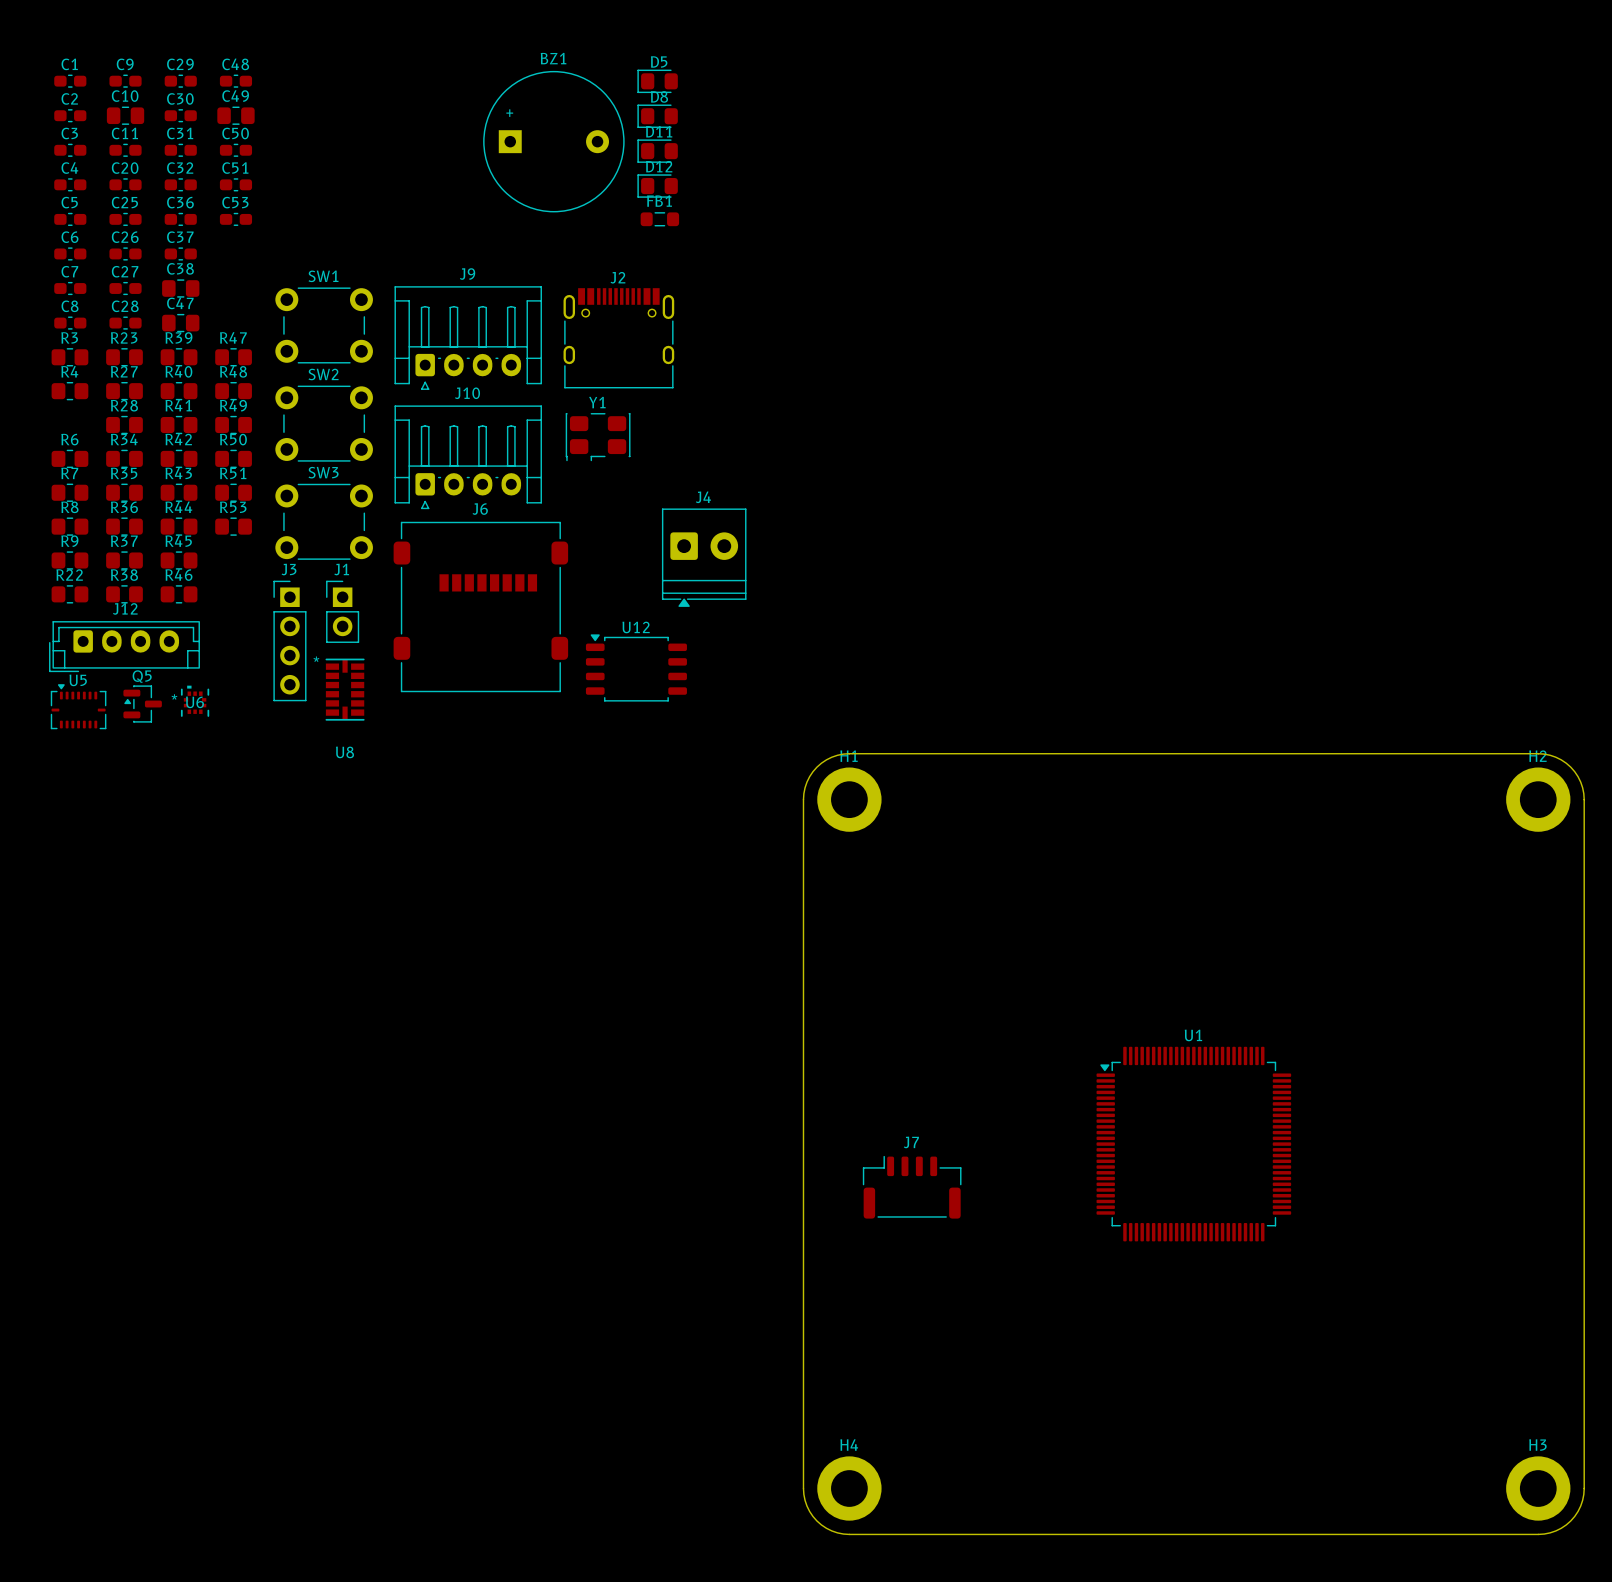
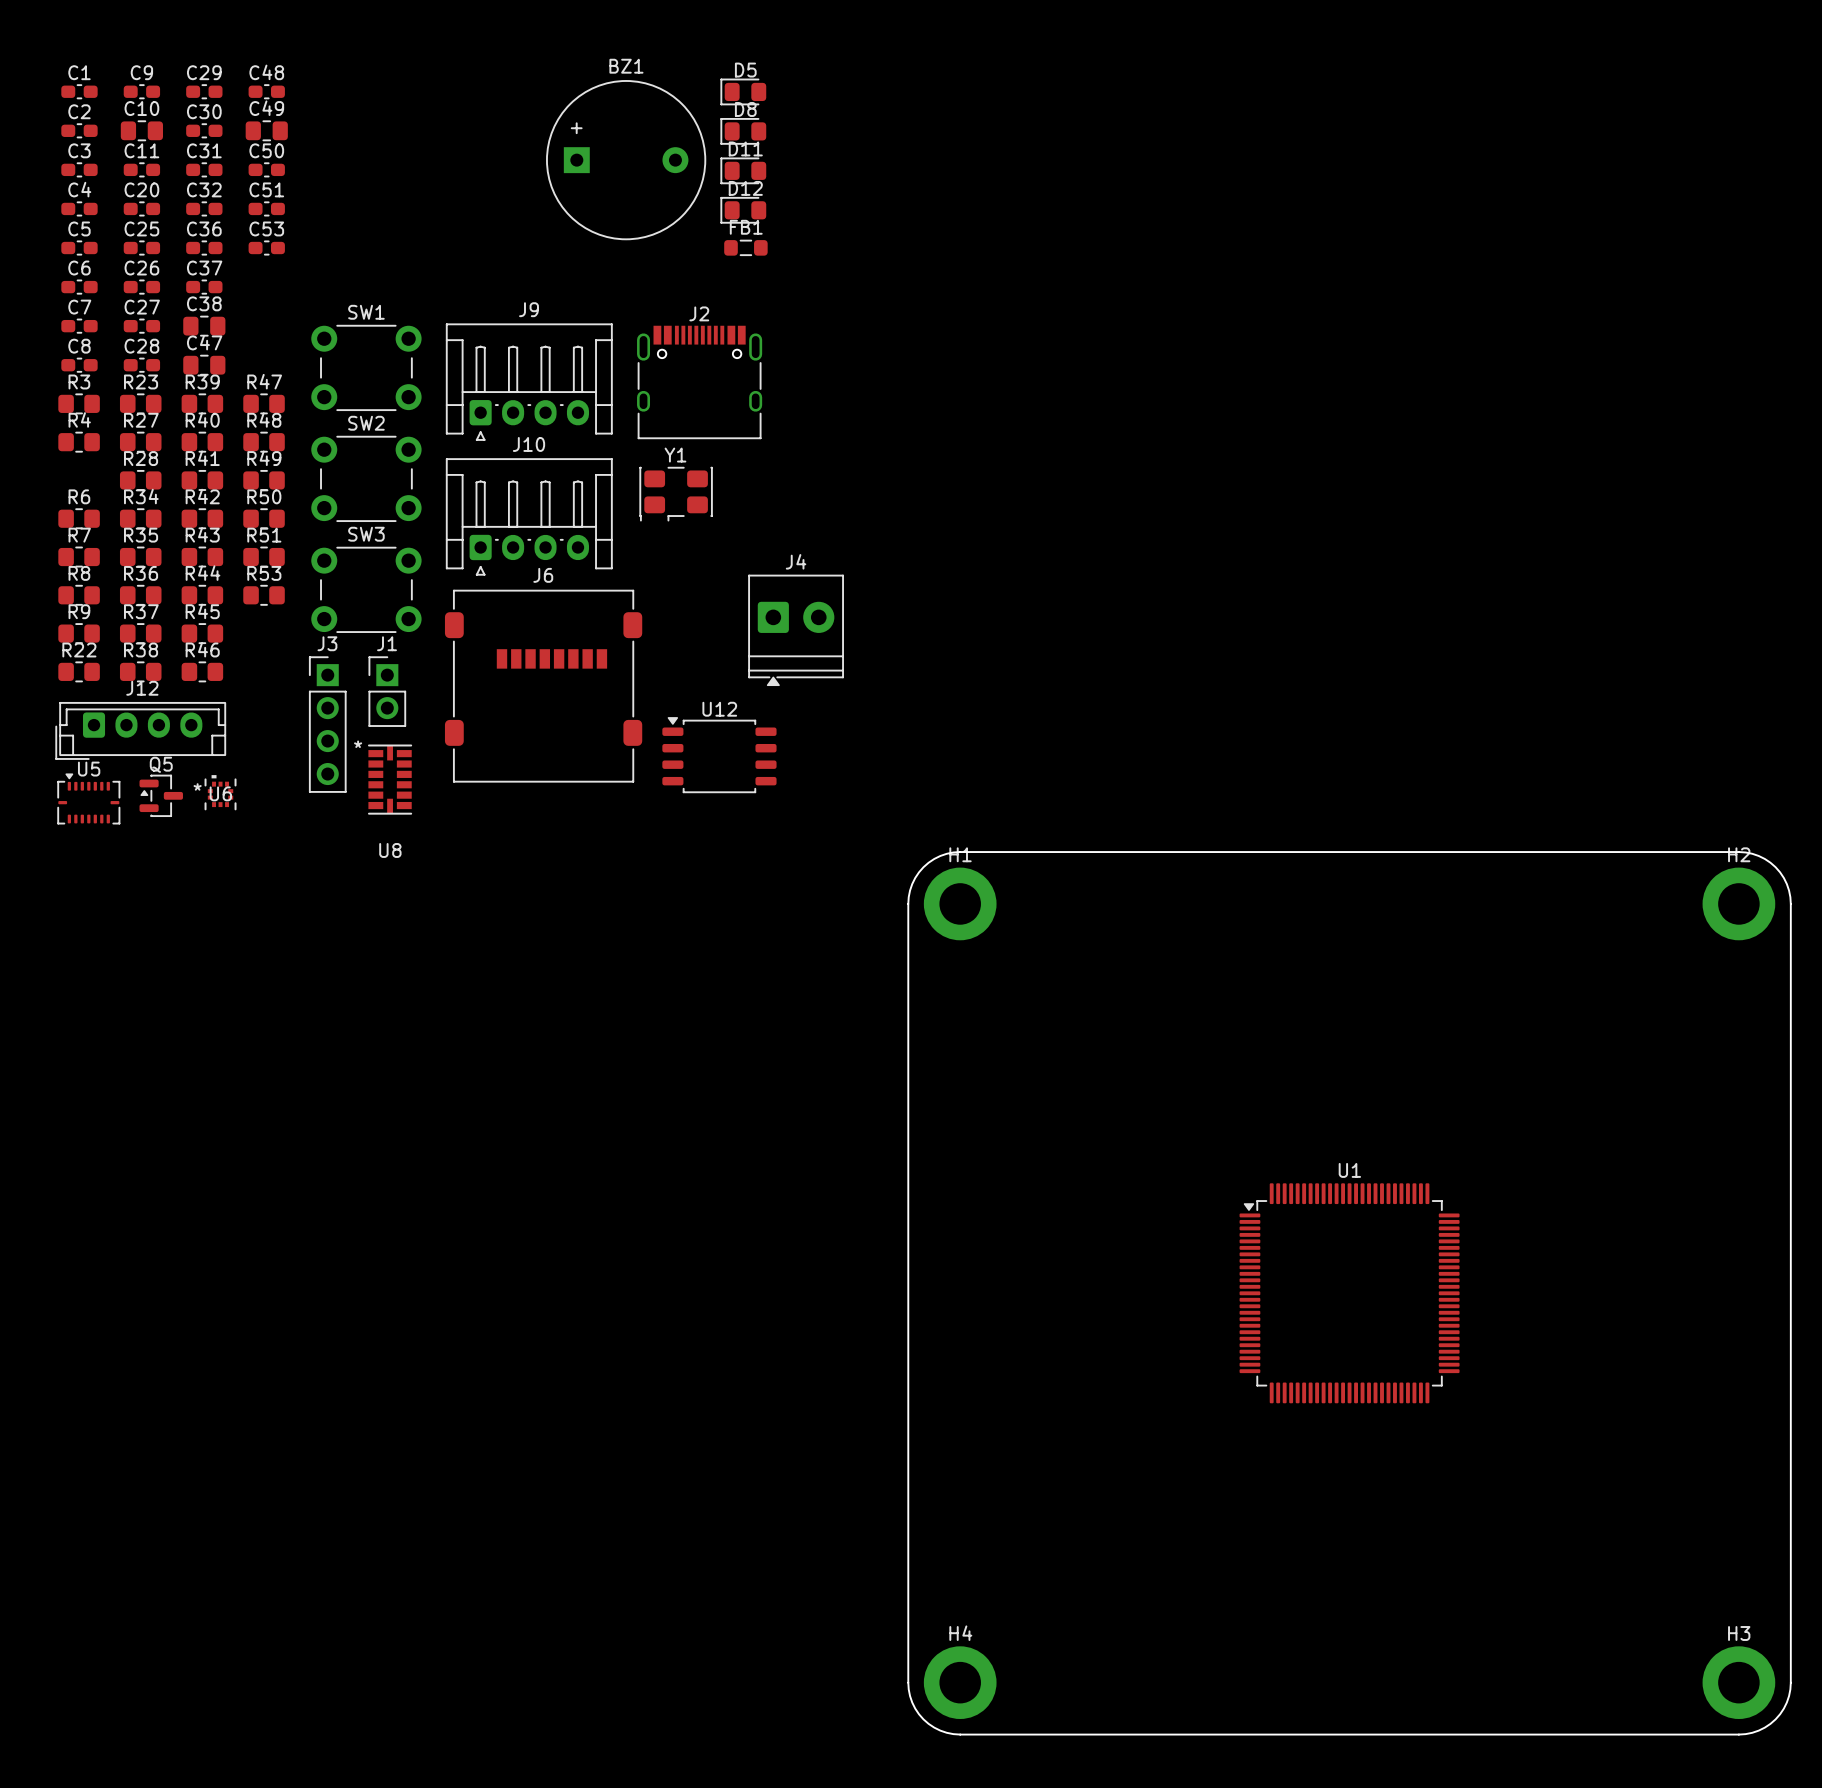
J7: (912, 1187) -> none

